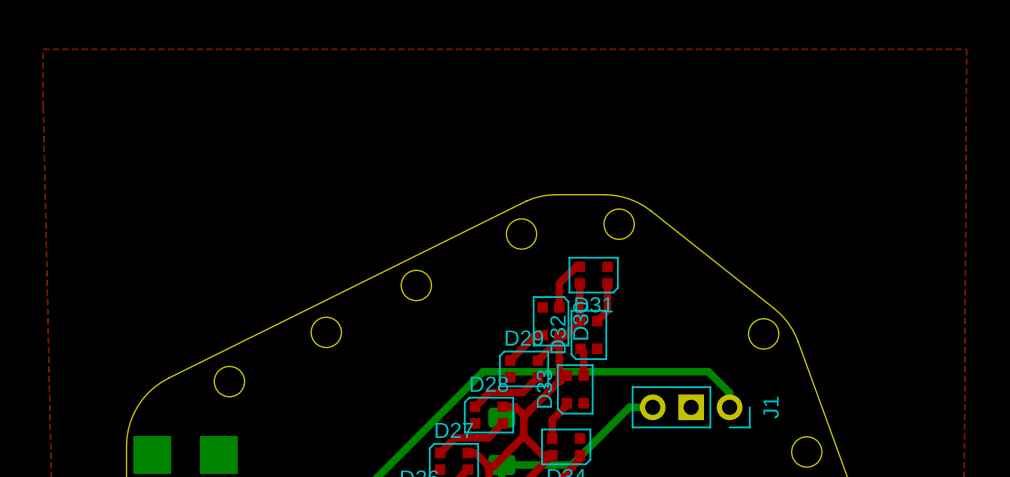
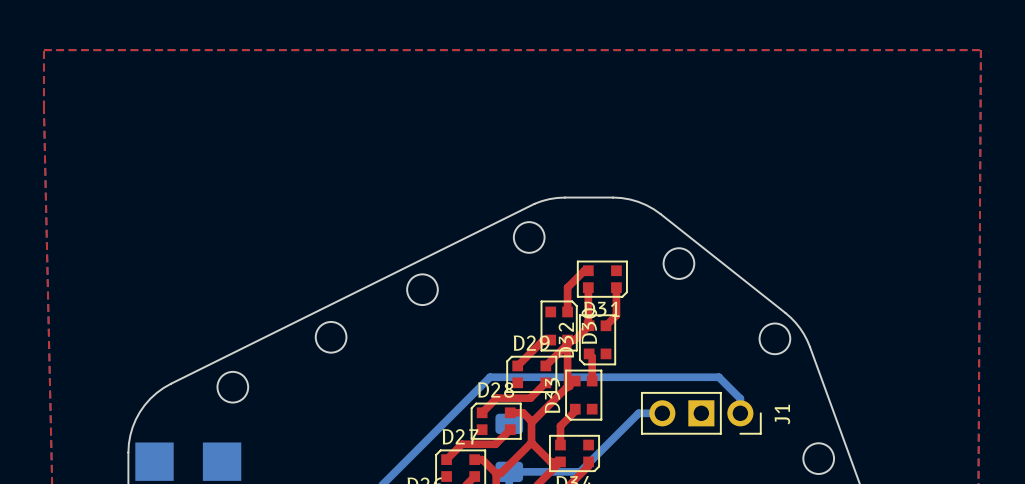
round board edge position: (619, 224) -> (678, 263)

